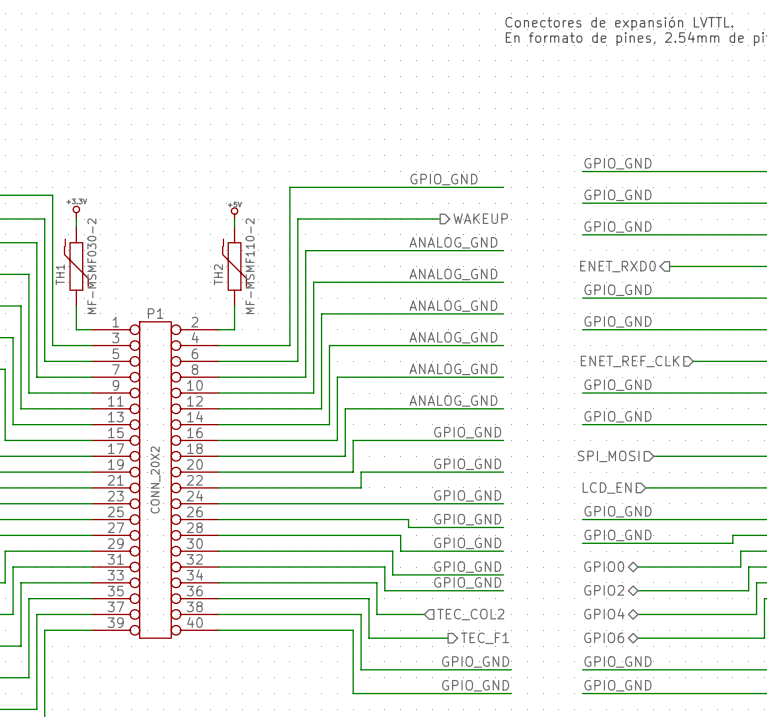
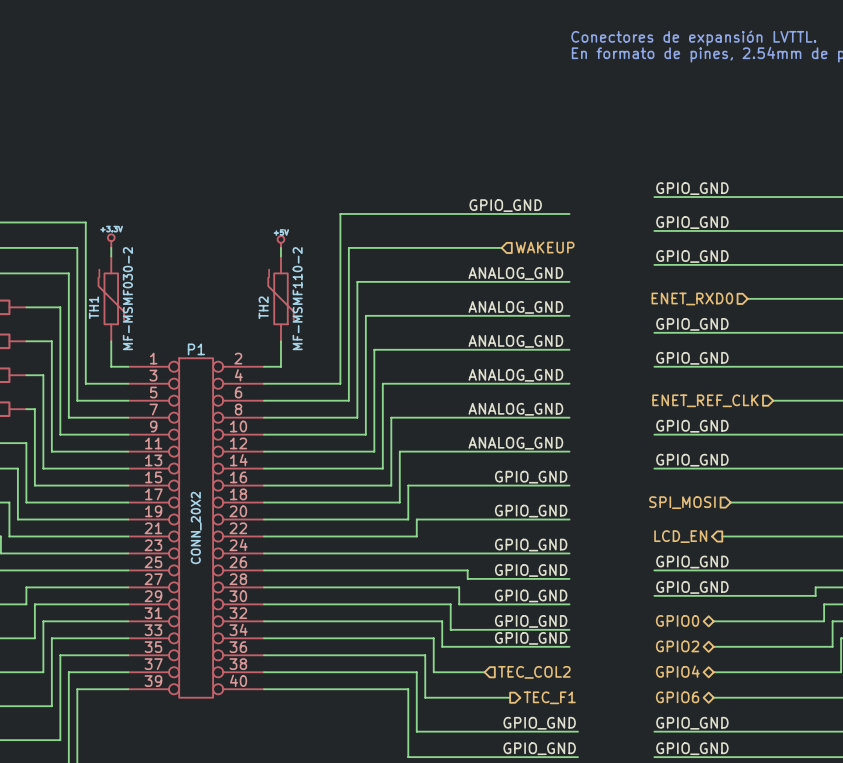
hierarchical label shape: output (480, 218) -> input (545, 247)
hierarchical label shape: output (617, 266) -> input (692, 298)
hierarchical label shape: input (607, 488) -> output (680, 536)

